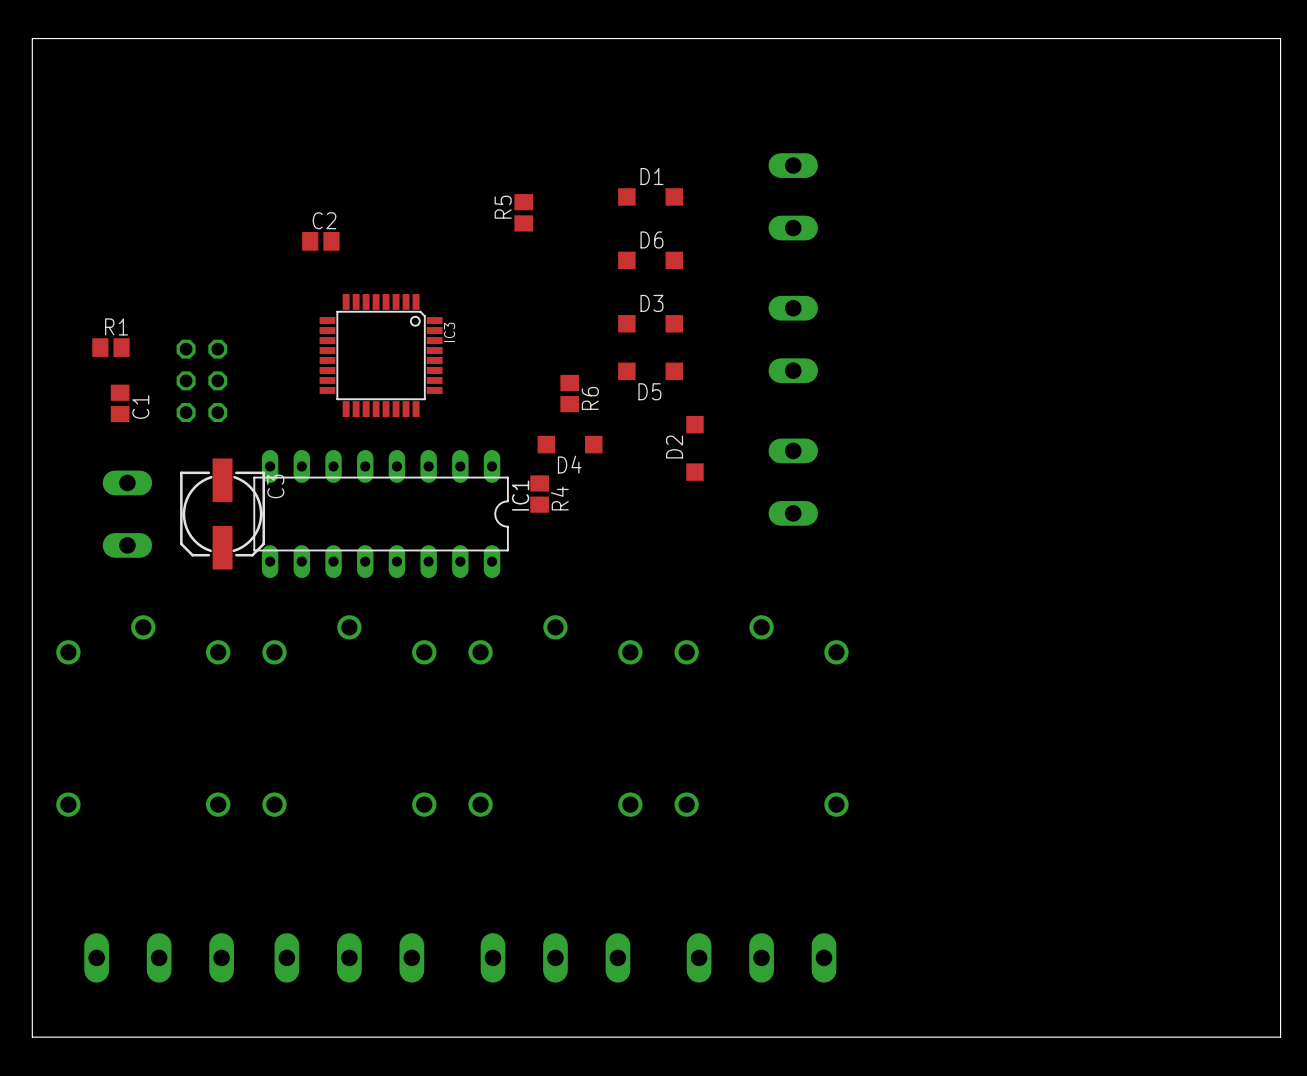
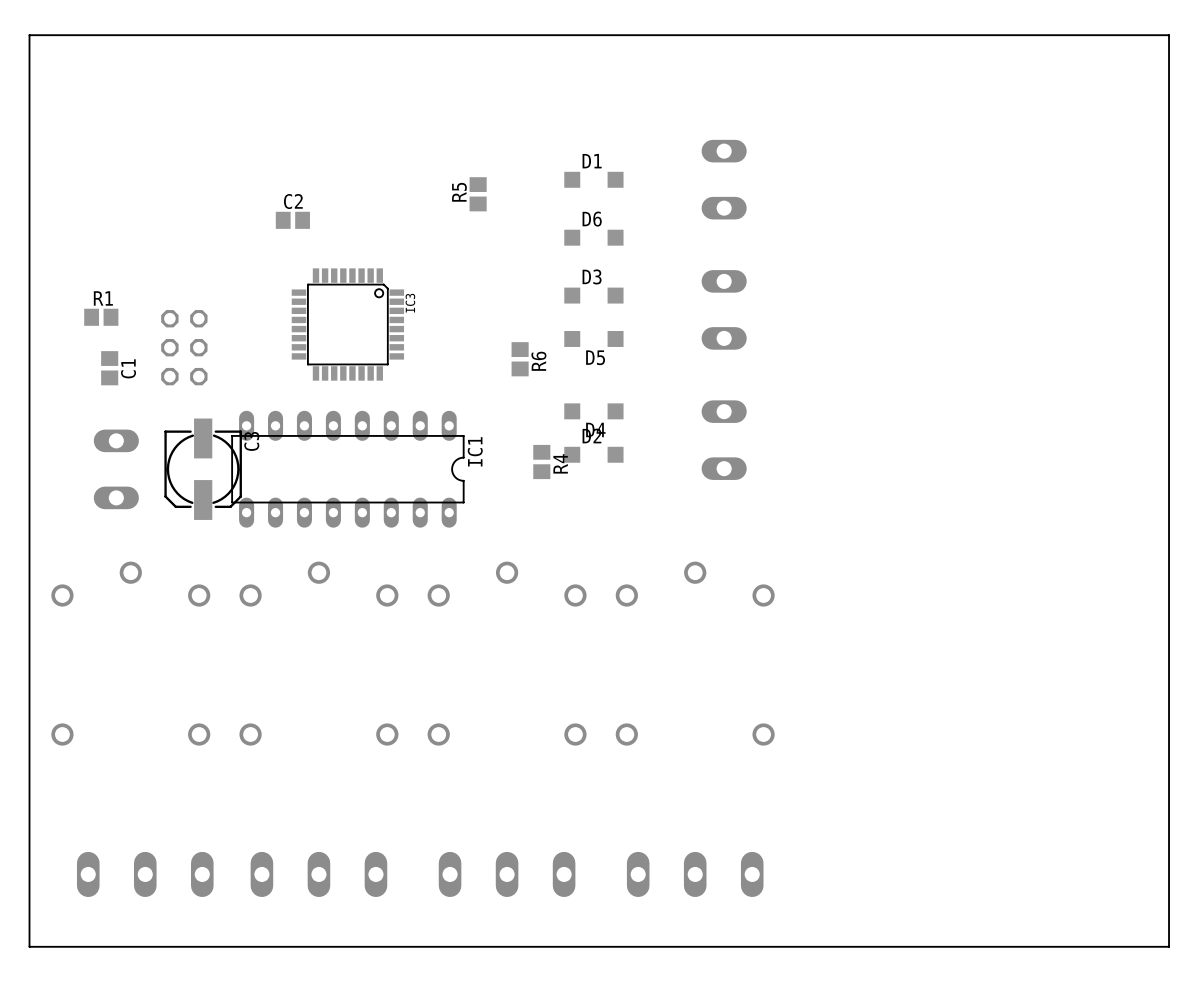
D4 position: (570, 444) -> (593, 411)
D2 rotation: 0° (694, 448) -> 90° clockwise (593, 454)
D2 position: (694, 448) -> (593, 454)
R4 position: (539, 494) -> (541, 462)

